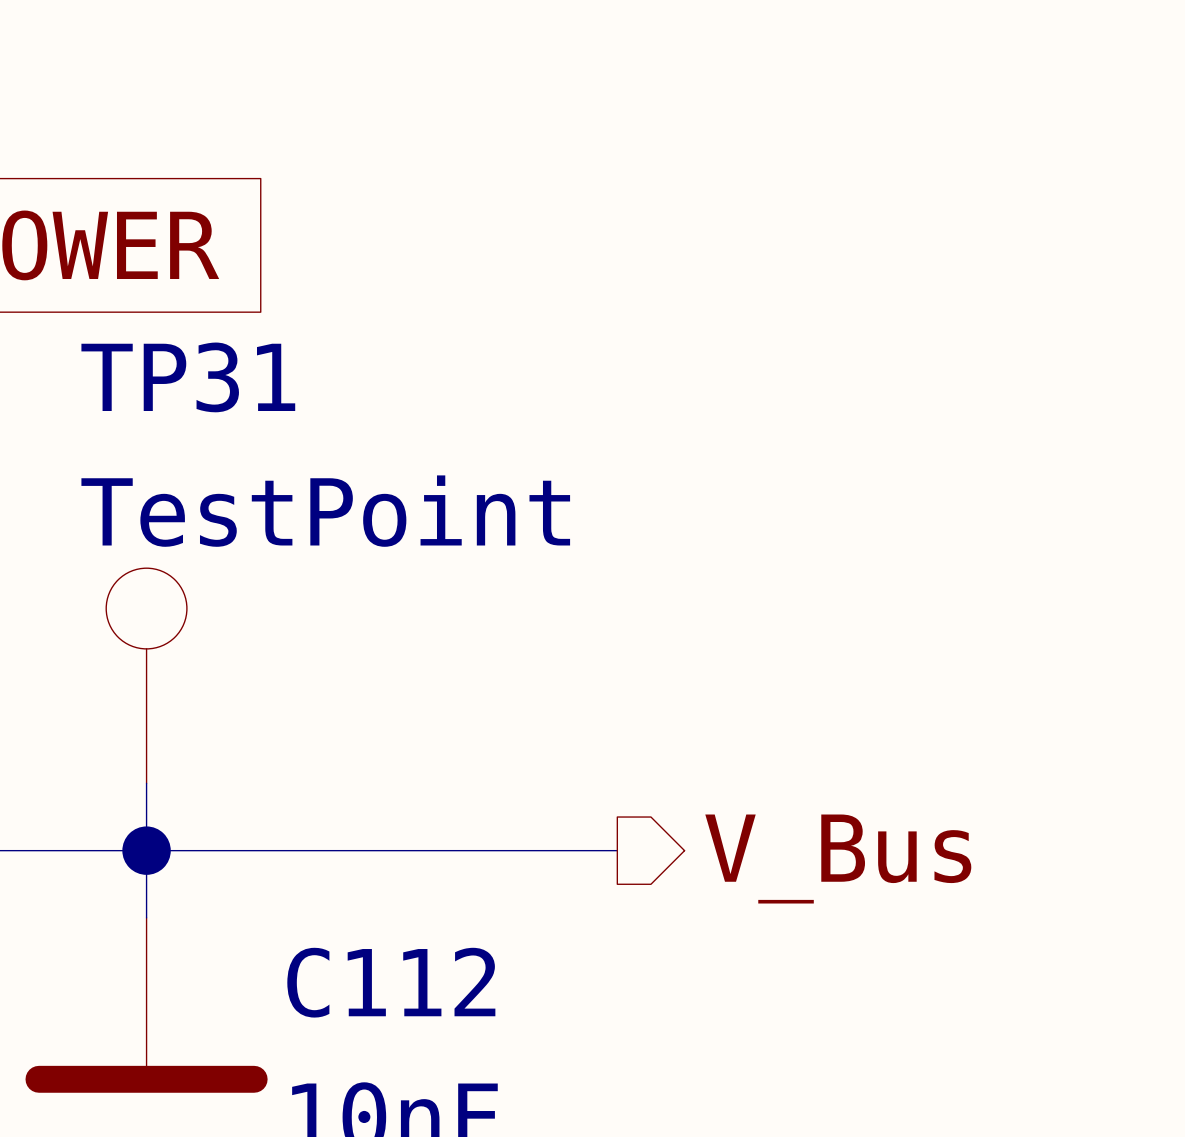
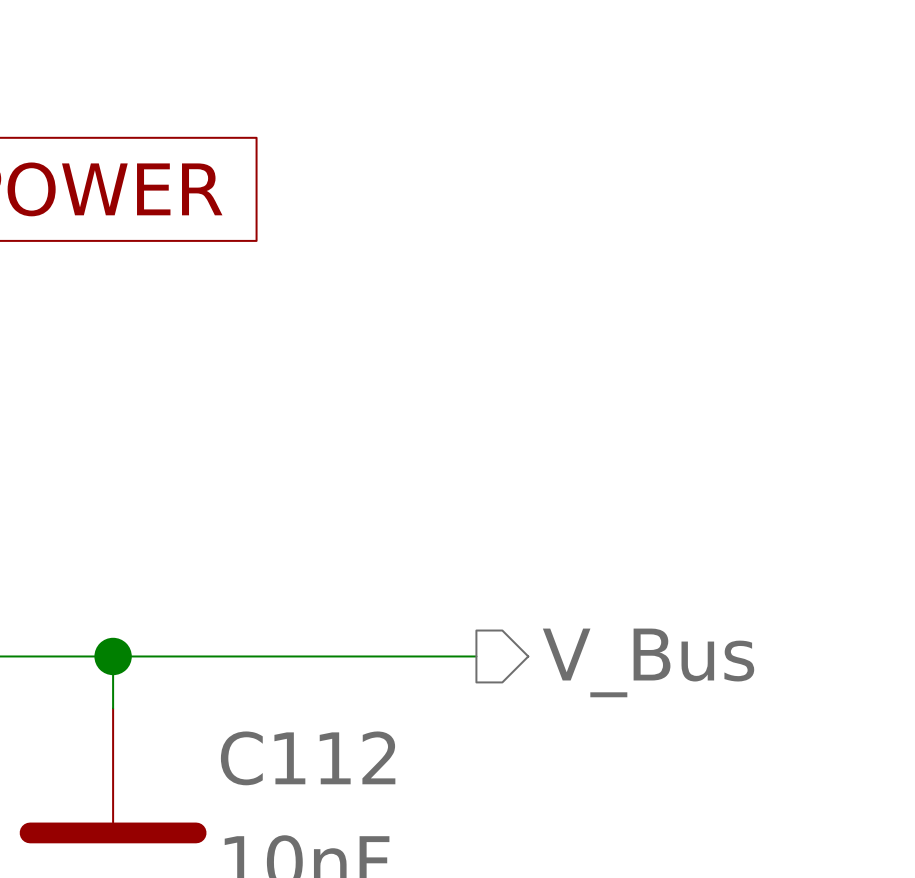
TP31: TestPoint (146, 675) -> none
wire: (146, 783) (146, 850) -> none

